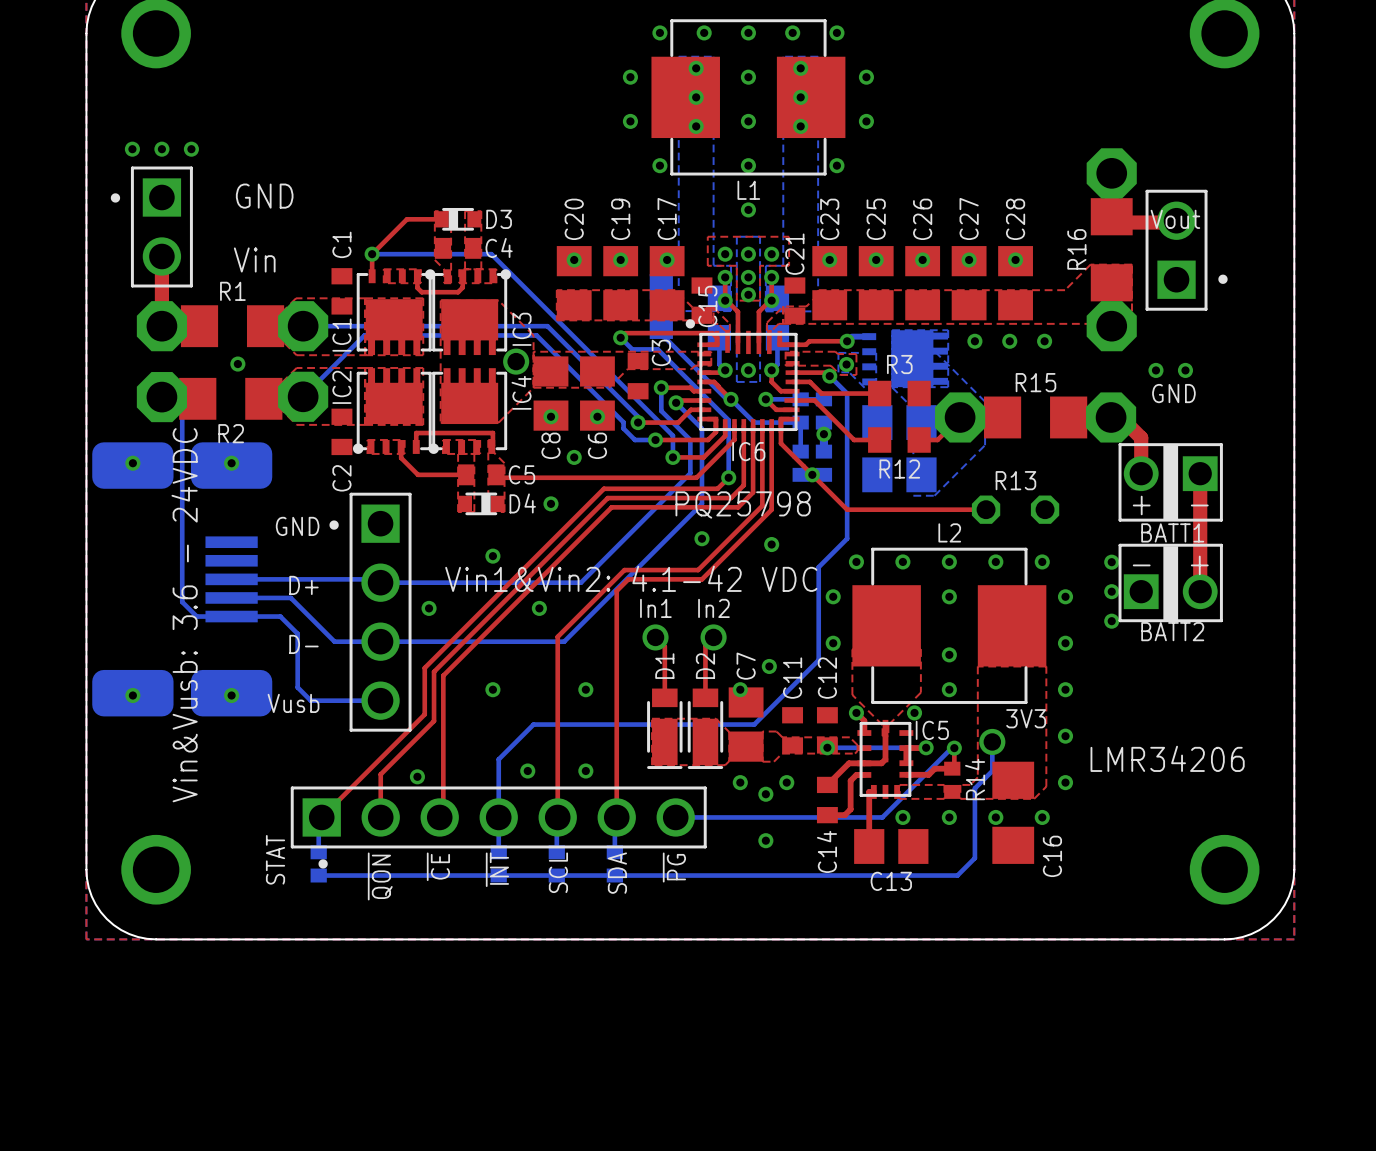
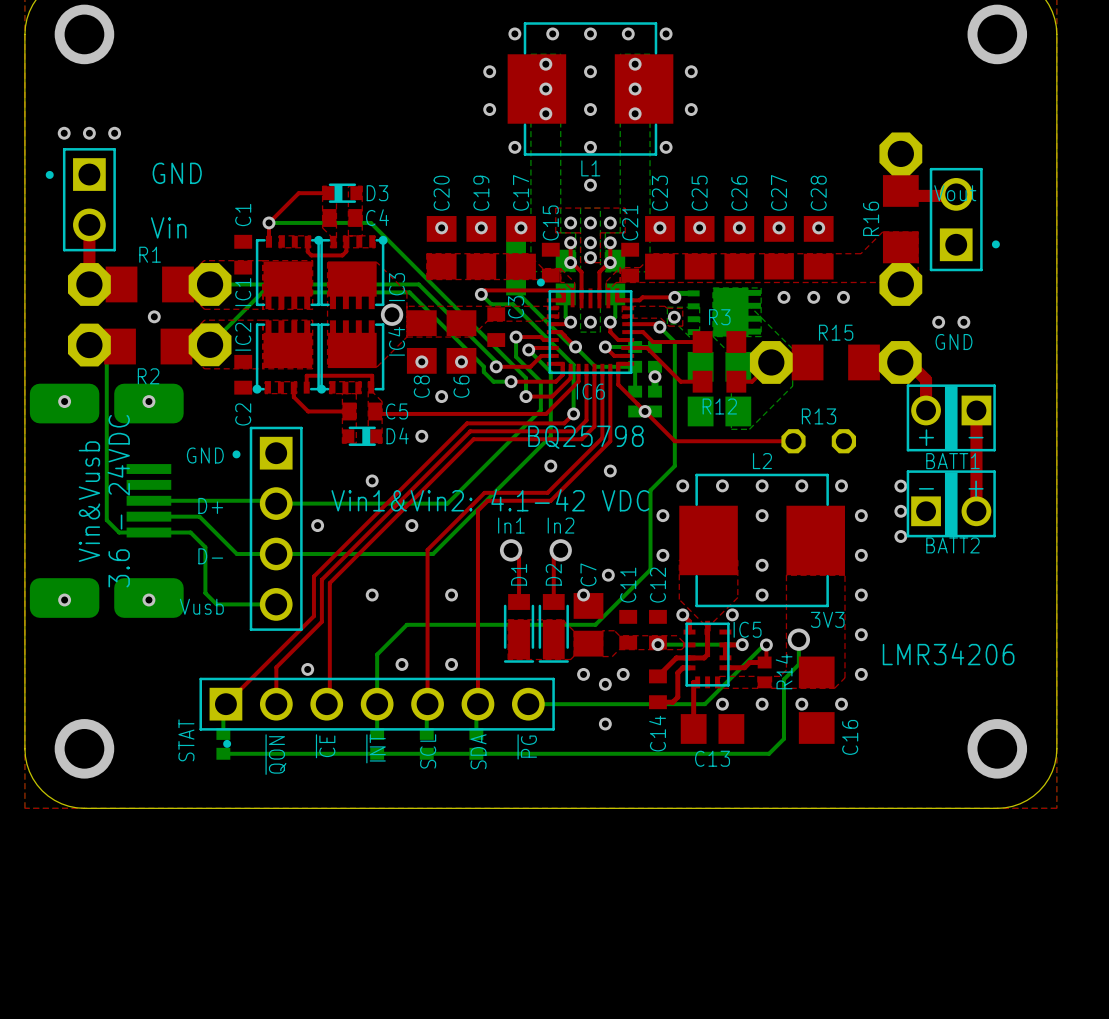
C15 name position: C15 (707, 306) -> C15 (550, 222)
text: PQ25798 (743, 504) -> BQ25798 (585, 437)
text: none -> Vin&Vusb (89, 501)
text: Vin&Vusb: 3.6 - 24VDC (184, 615) -> 3.6 - 24VDC (118, 501)

